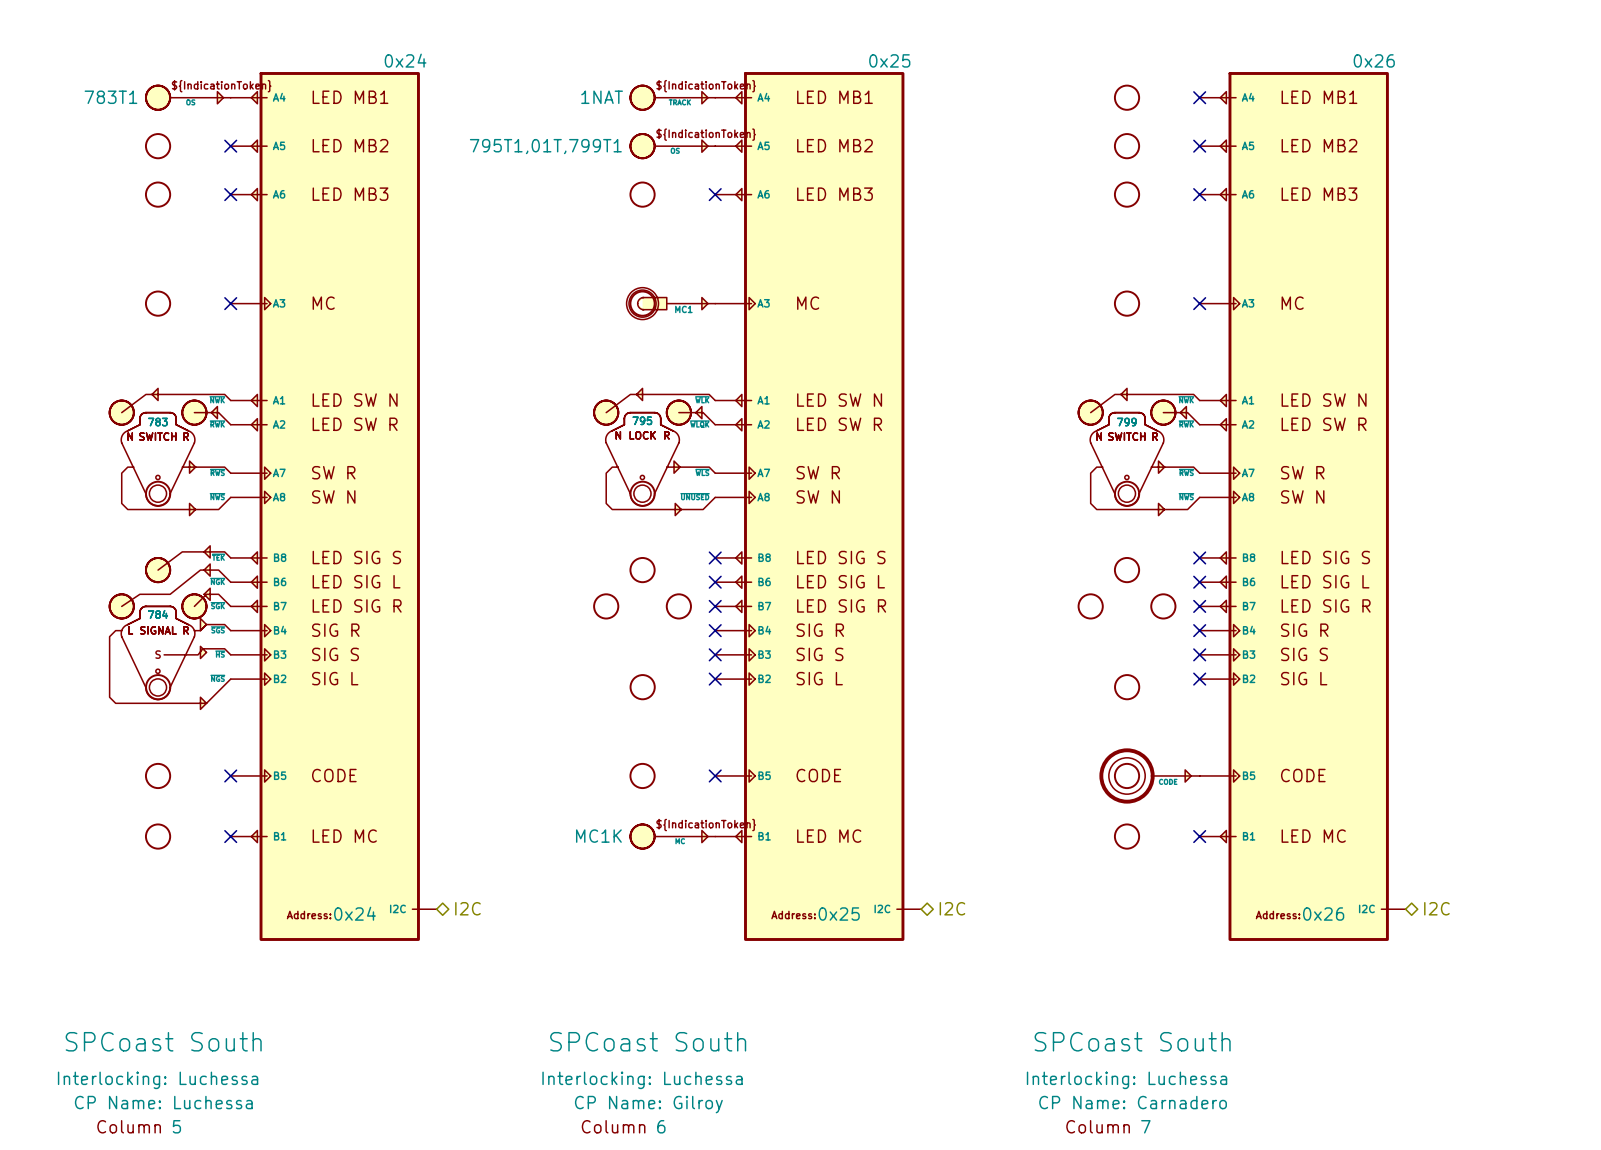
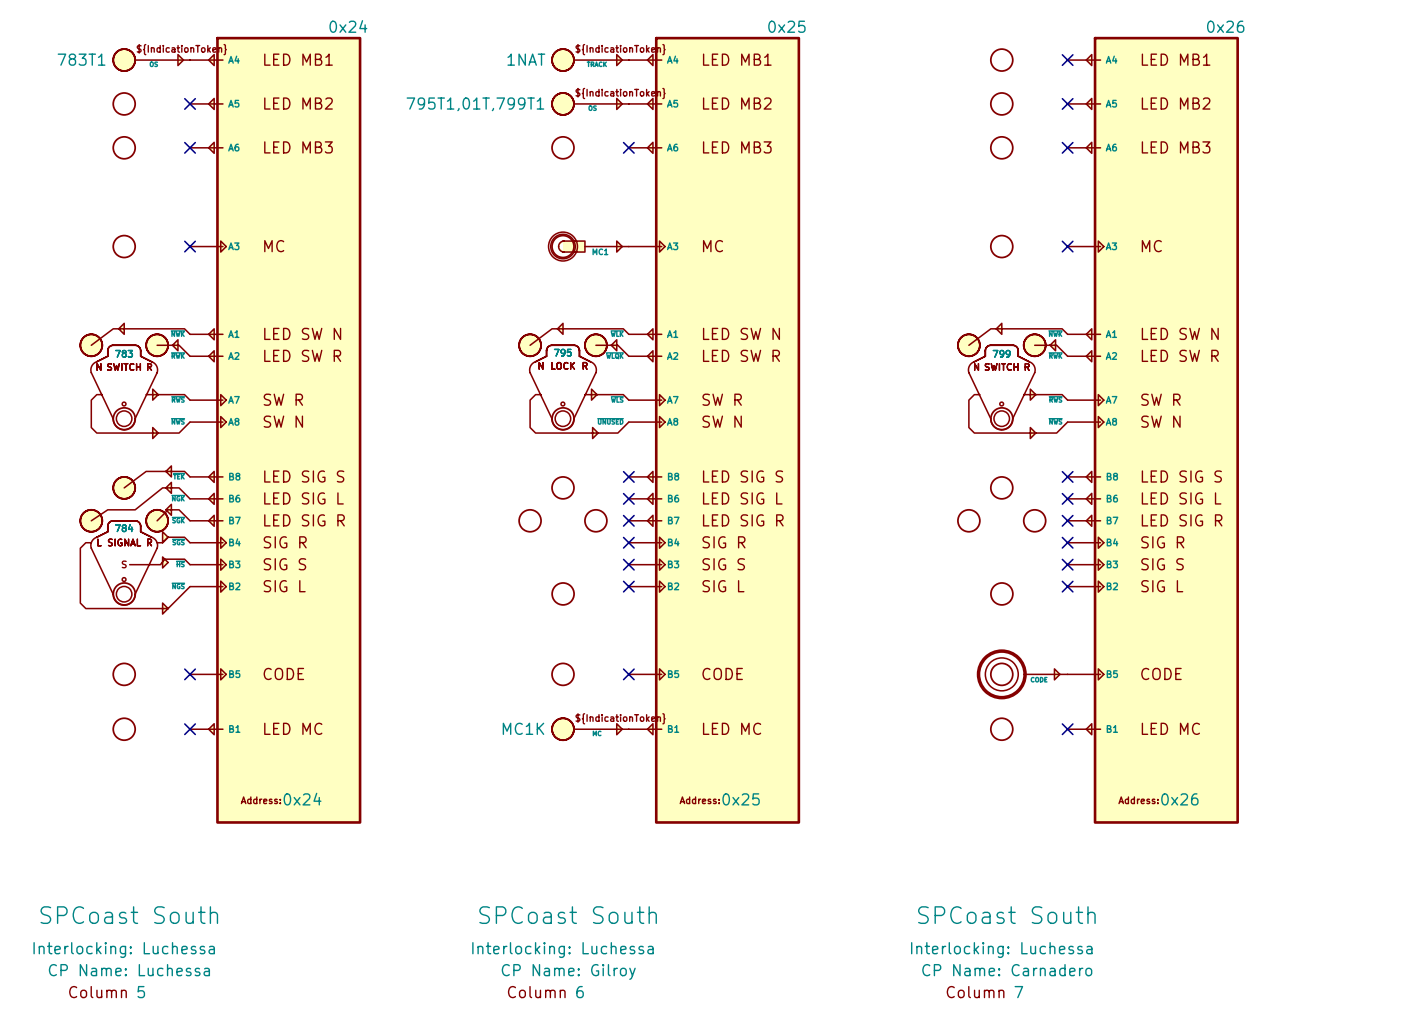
part symbol: [230, 72, 437, 941] -> [190, 36, 362, 824]
part symbol: [715, 72, 922, 941] -> [628, 36, 801, 824]
part symbol: [1199, 72, 1406, 941] -> [1067, 36, 1239, 824]
hierarchical label: I2C (467, 908) -> none
hierarchical label: I2C (952, 908) -> none
hierarchical label: I2C (1436, 908) -> none

